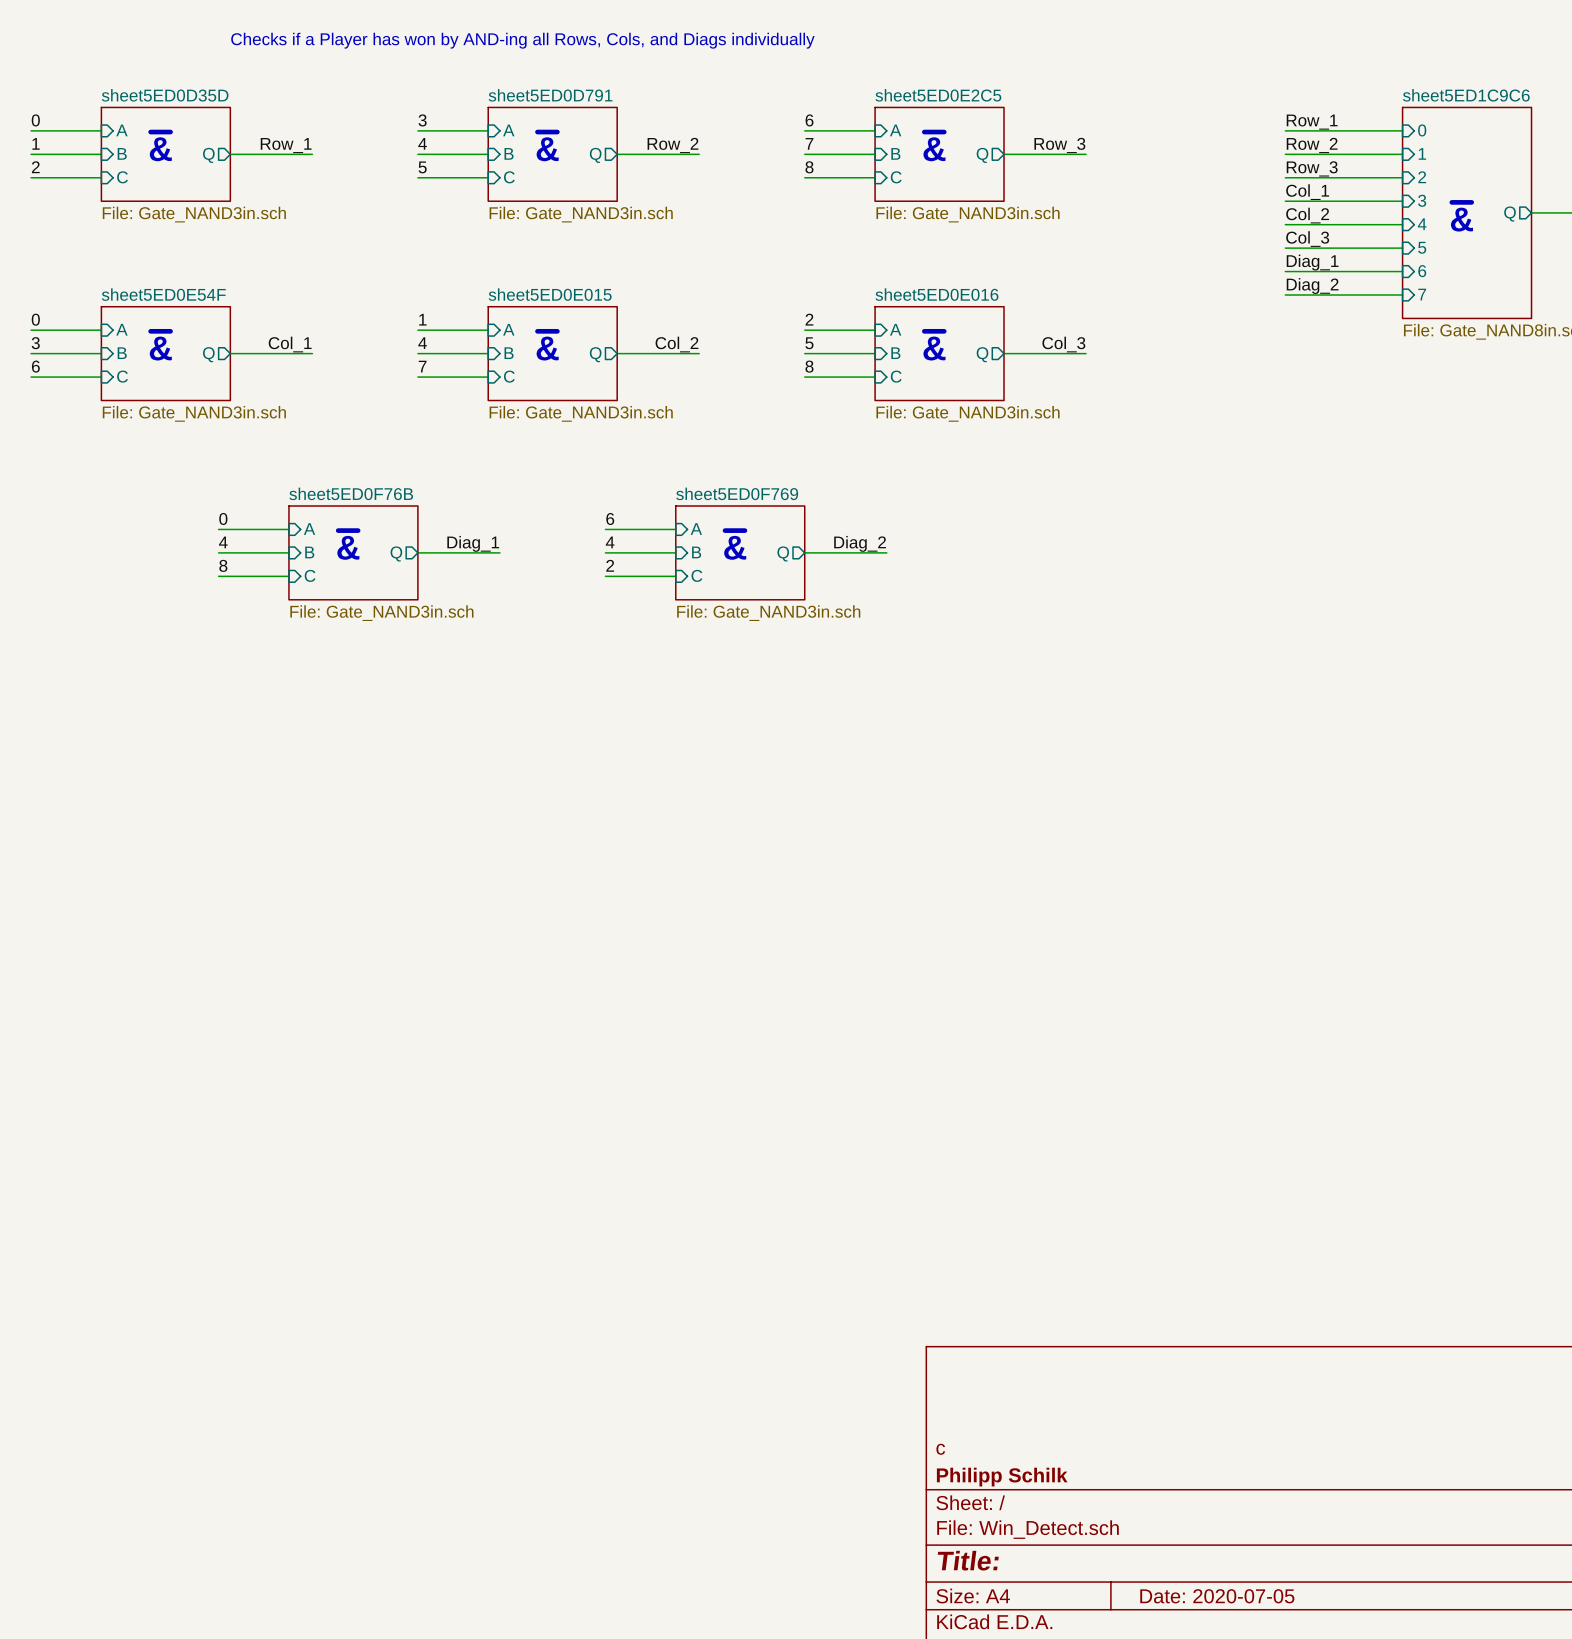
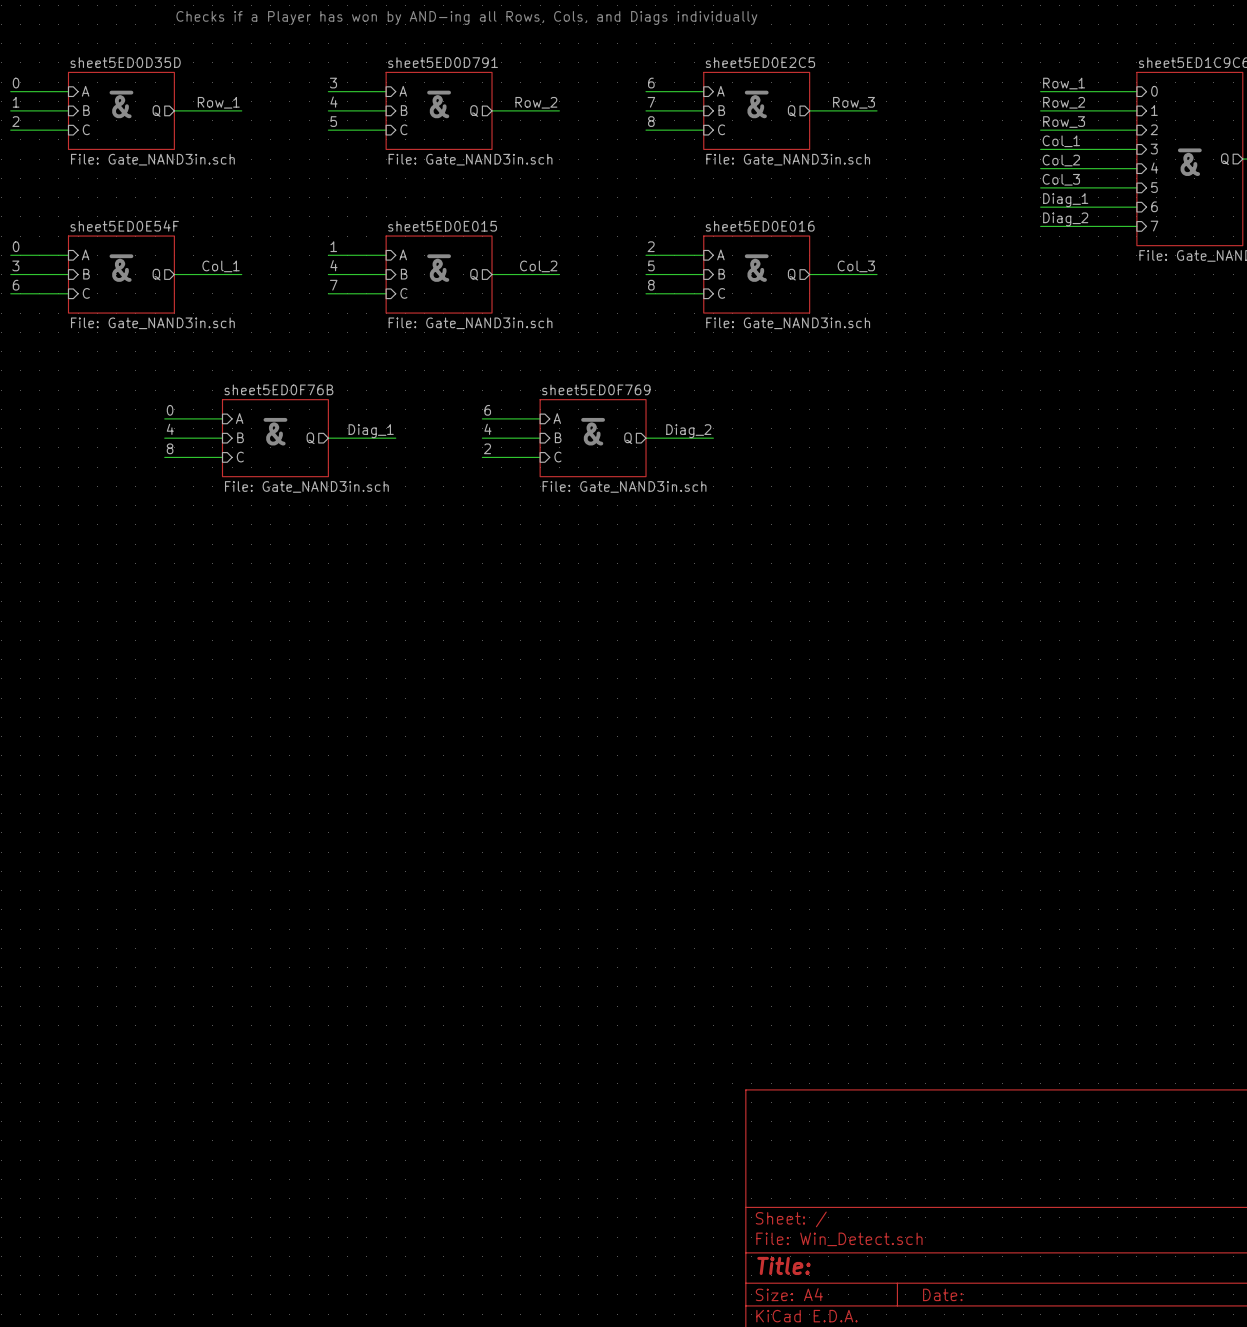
title block: c (940, 1449) -> none
title block: Philipp Schilk (1002, 1477) -> none
title block: Date: 2020-07-05 (1217, 1596) -> Date: (942, 1294)

